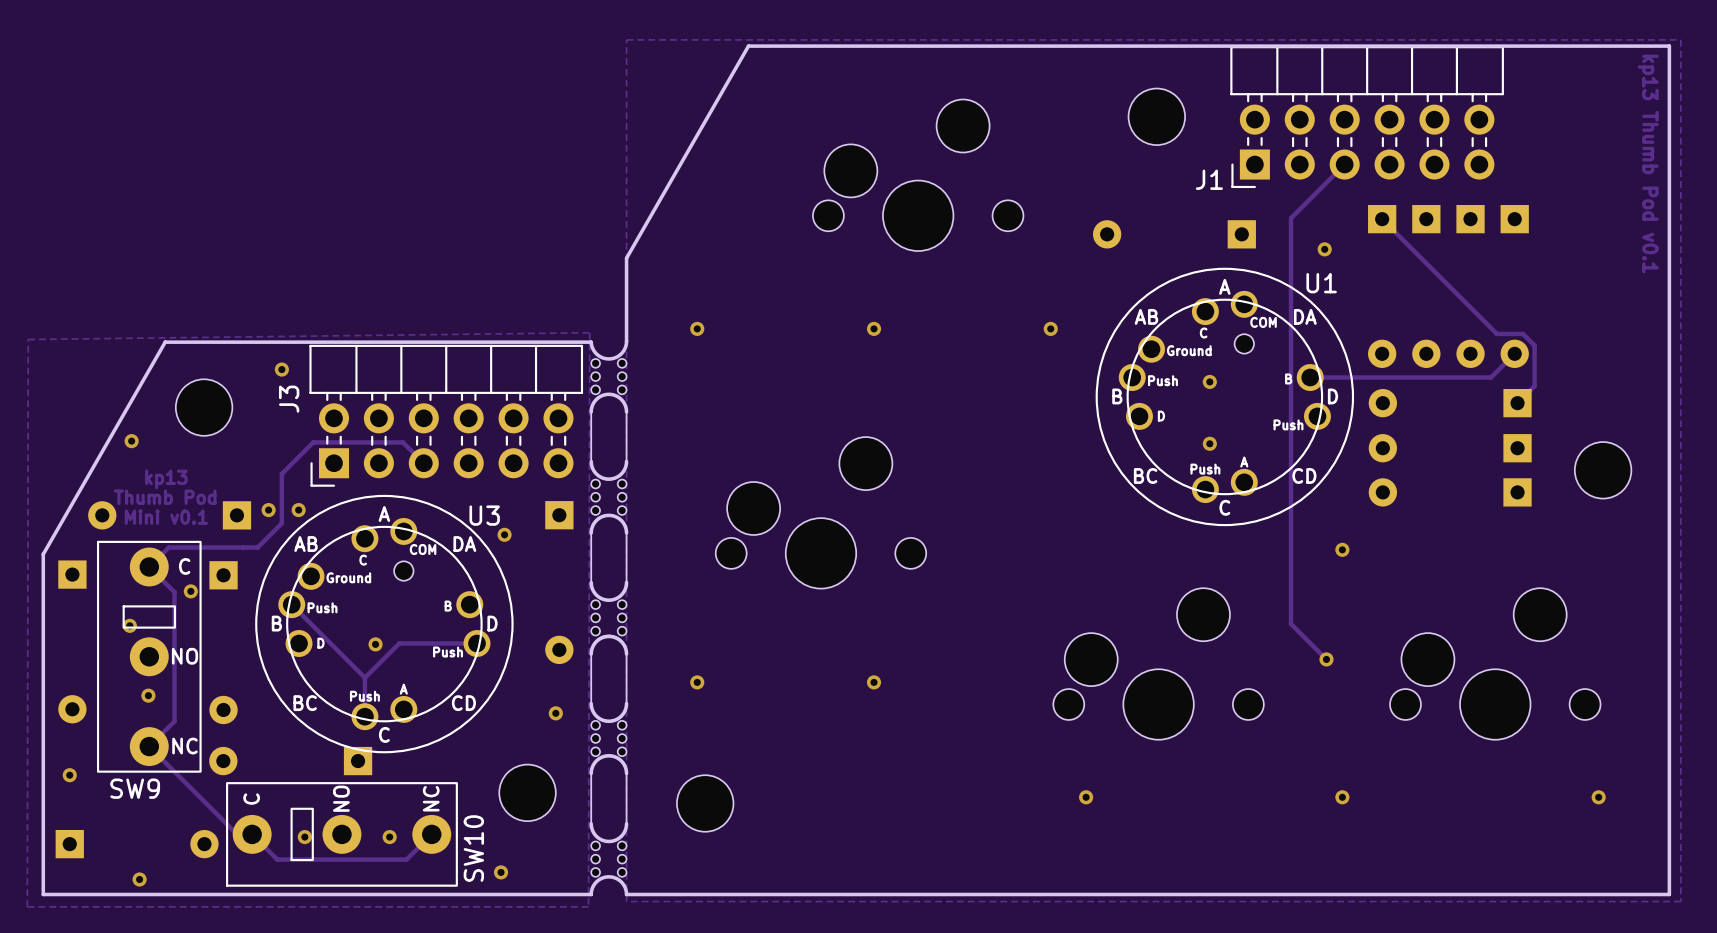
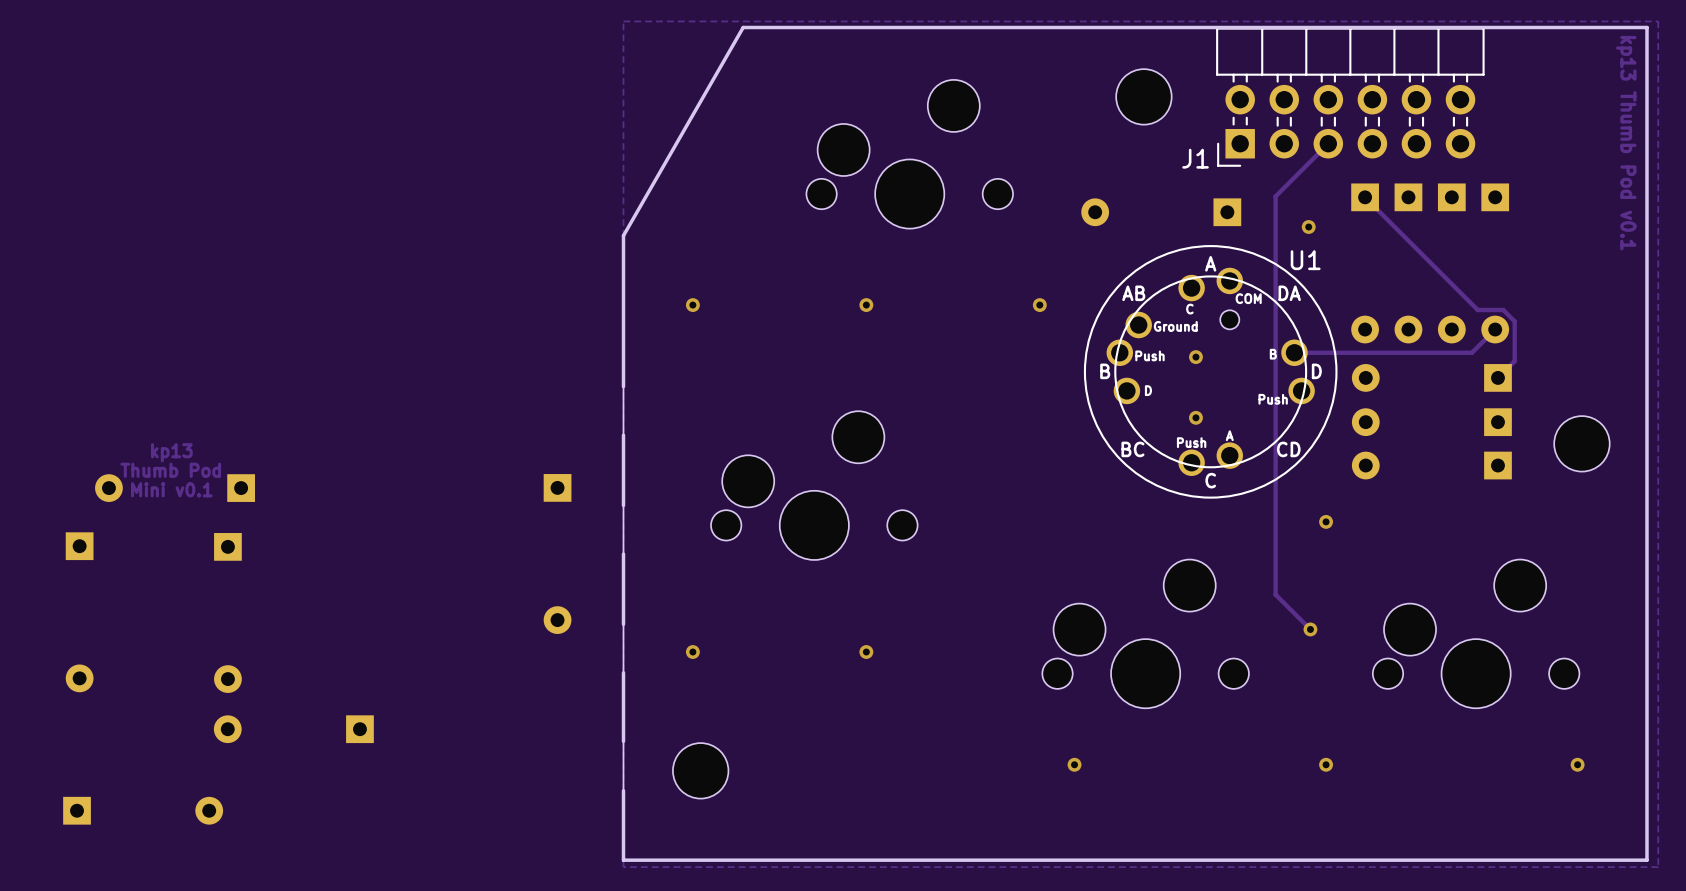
zone outline: (589, 332) (28, 339) (27, 906) (588, 906) (589, 332) -> none
board edge: (626, 341) (621, 353) (609, 358) (596, 354) (591, 342) (165, 342) (43, 554) (43, 894) (591, 894) (596, 882) (608, 876) (621, 882) (626, 894) -> none
via: (281, 369) -> none
part: (608, 376) -> none
part: (204, 407) -> none
board edge: (626, 411) (622, 400) (617, 396) (608, 394) (600, 396) (595, 400) (591, 411) (591, 461) (594, 472) (604, 478) (613, 478) (622, 472) (626, 461) -> (623, 386) (623, 317)
J3: (446, 415) -> none
via: (131, 441) -> none
track: (413, 463) (423, 463) (403, 442) (313, 442) (281, 473) (281, 523) (257, 547) (168, 547) (149, 566) (174, 592) (174, 721) (149, 746) (237, 834) (252, 834) (277, 859) (406, 859) (431, 834) -> none
part: (608, 497) -> none
via: (268, 510) -> none
via: (298, 510) -> none
board edge: (626, 533) (621, 520) (608, 515) (596, 520) (591, 533) (591, 582) (594, 593) (604, 599) (613, 599) (622, 593) (626, 582) -> (623, 505) (623, 435)
via: (504, 534) -> none
board edge: none -> (623, 554) (623, 624)
via: (190, 591) -> none
track: (291, 604) (364, 677) -> none
part: (608, 617) -> none
U3: (384, 624) -> none
via: (129, 625) -> none
track: (477, 643) (399, 643) (364, 677) -> none
via: (375, 644) -> none
board edge: (626, 654) (625, 647) (620, 640) (608, 636) (597, 640) (592, 647) (591, 654) (591, 703) (594, 714) (604, 720) (615, 719) (622, 714) (626, 703) -> (623, 741) (623, 672)
SW9: (149, 656) -> none
track: (364, 677) (364, 716) -> none
via: (148, 695) -> none
via: (555, 713) -> none
part: (608, 738) -> none
board edge: (626, 773) (621, 760) (608, 755) (596, 760) (591, 773) (591, 823) (594, 834) (604, 840) (615, 840) (622, 834) (626, 823) -> (623, 860) (623, 790)
via: (69, 775) -> none
part: (527, 792) -> none
SW10: (341, 834) -> none
via: (304, 837) -> none
via: (389, 837) -> none
part: (608, 859) -> none
via: (501, 872) -> none
via: (139, 879) -> none

